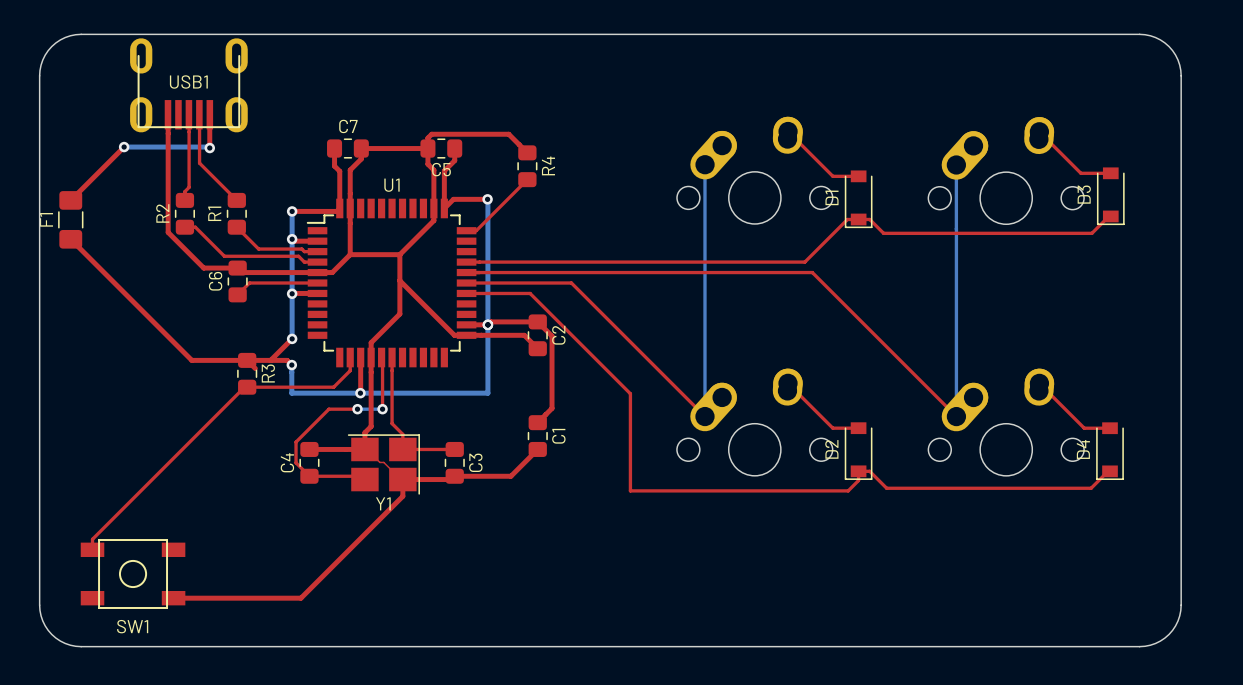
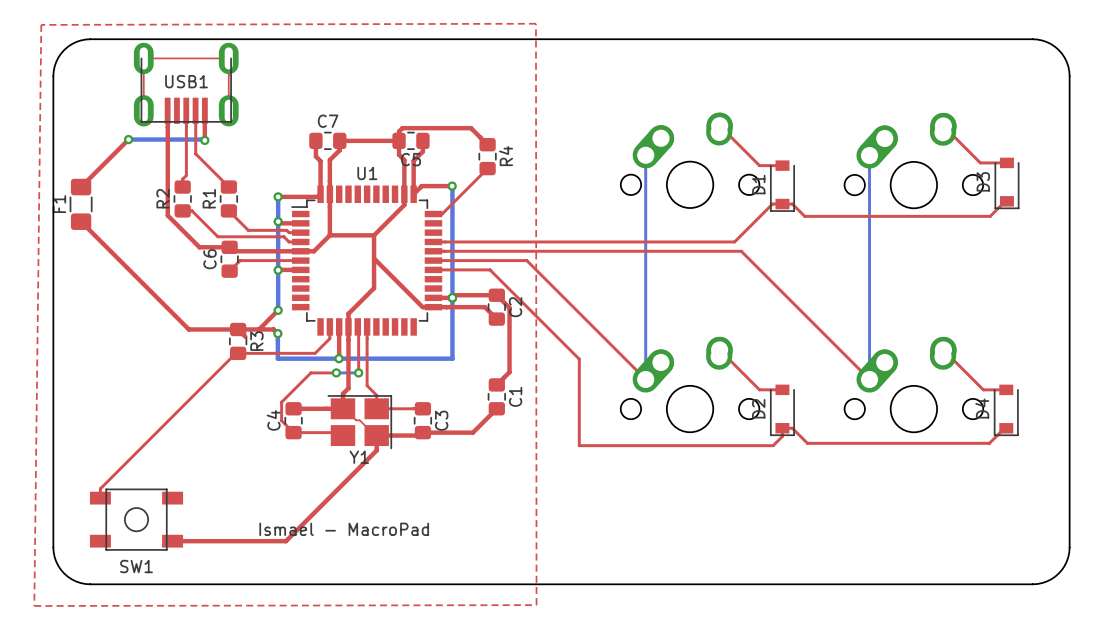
top zone outline: none -> (535, 23) (536, 605) (34, 606) (41, 24) (535, 23)
top track: none -> (143, 110) (143, 58) (228, 58) (228, 110)
text: none -> Ismael - MacroPad (344, 529)

